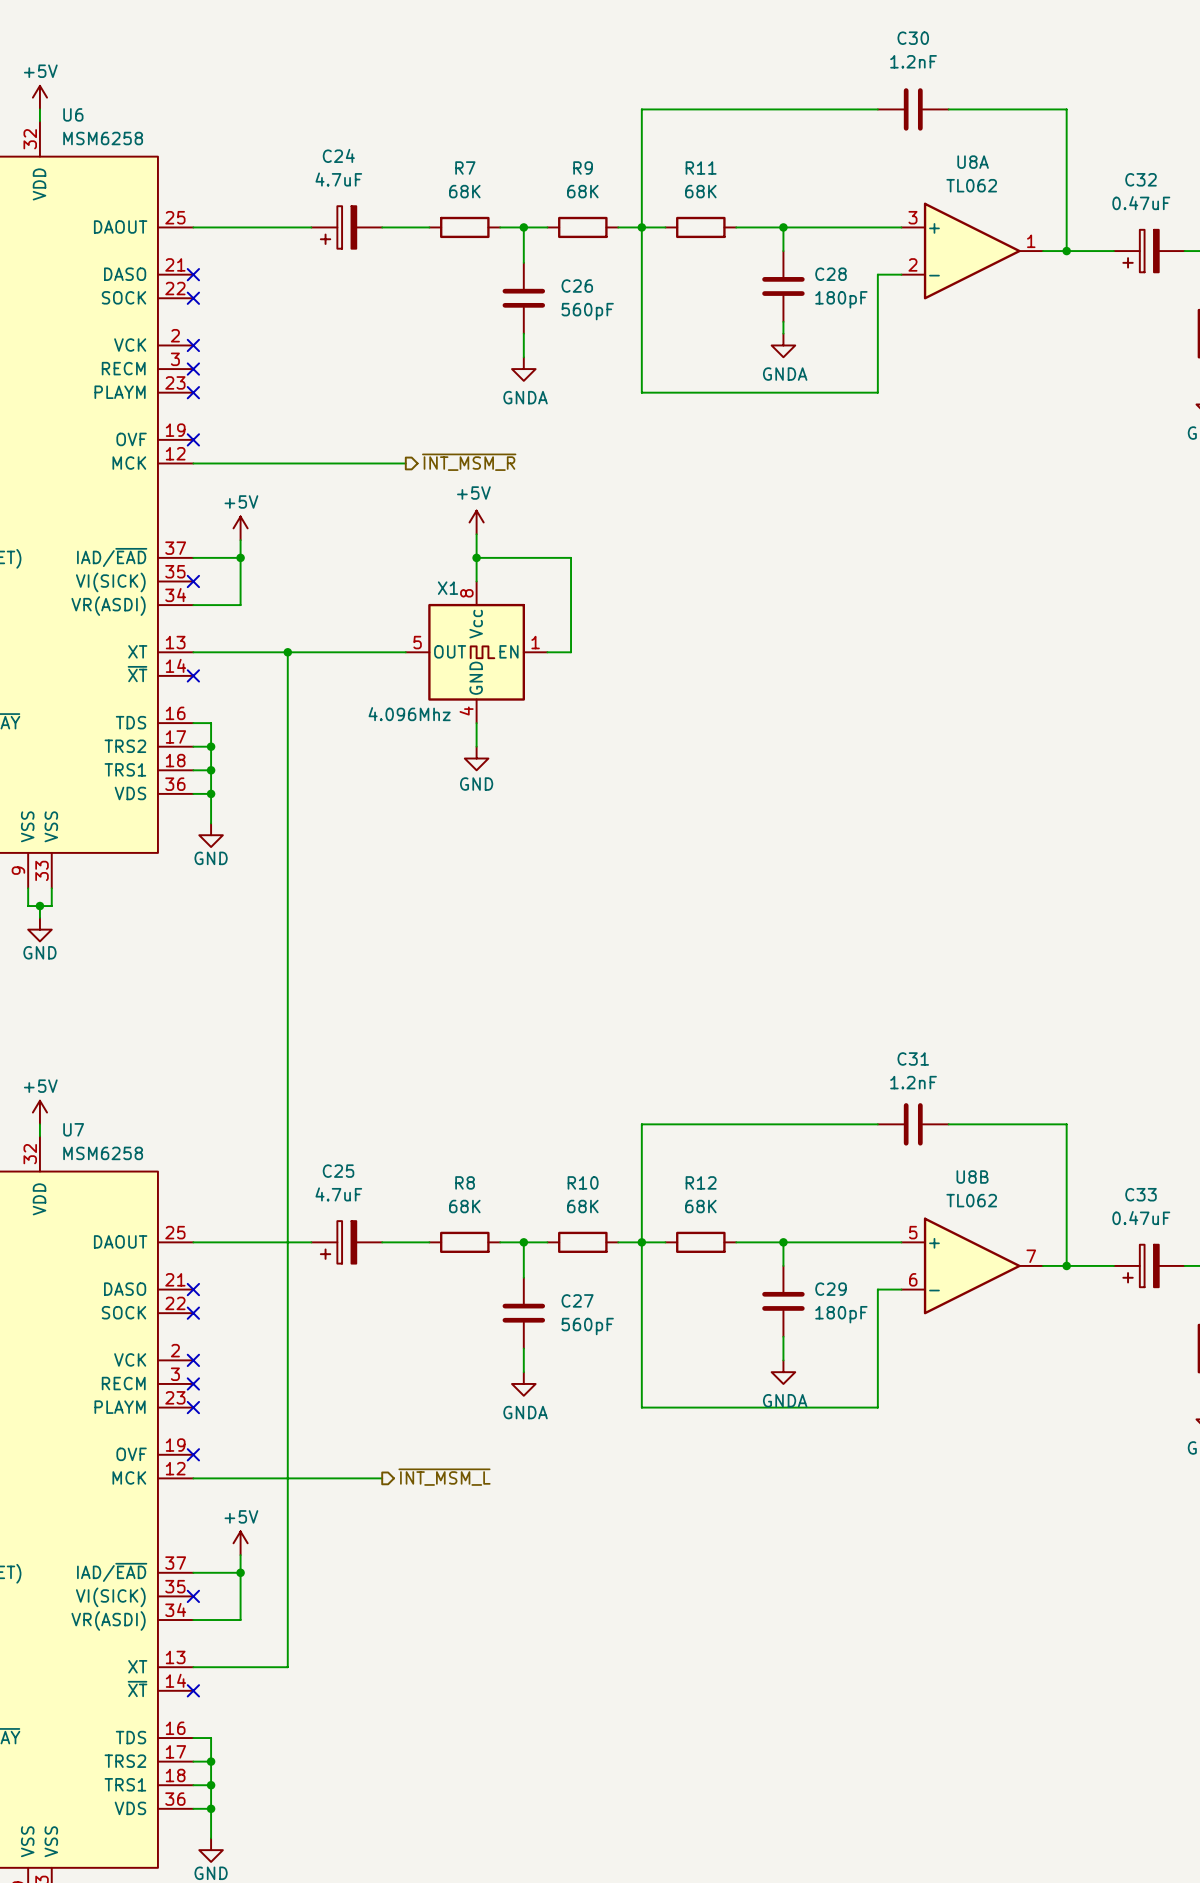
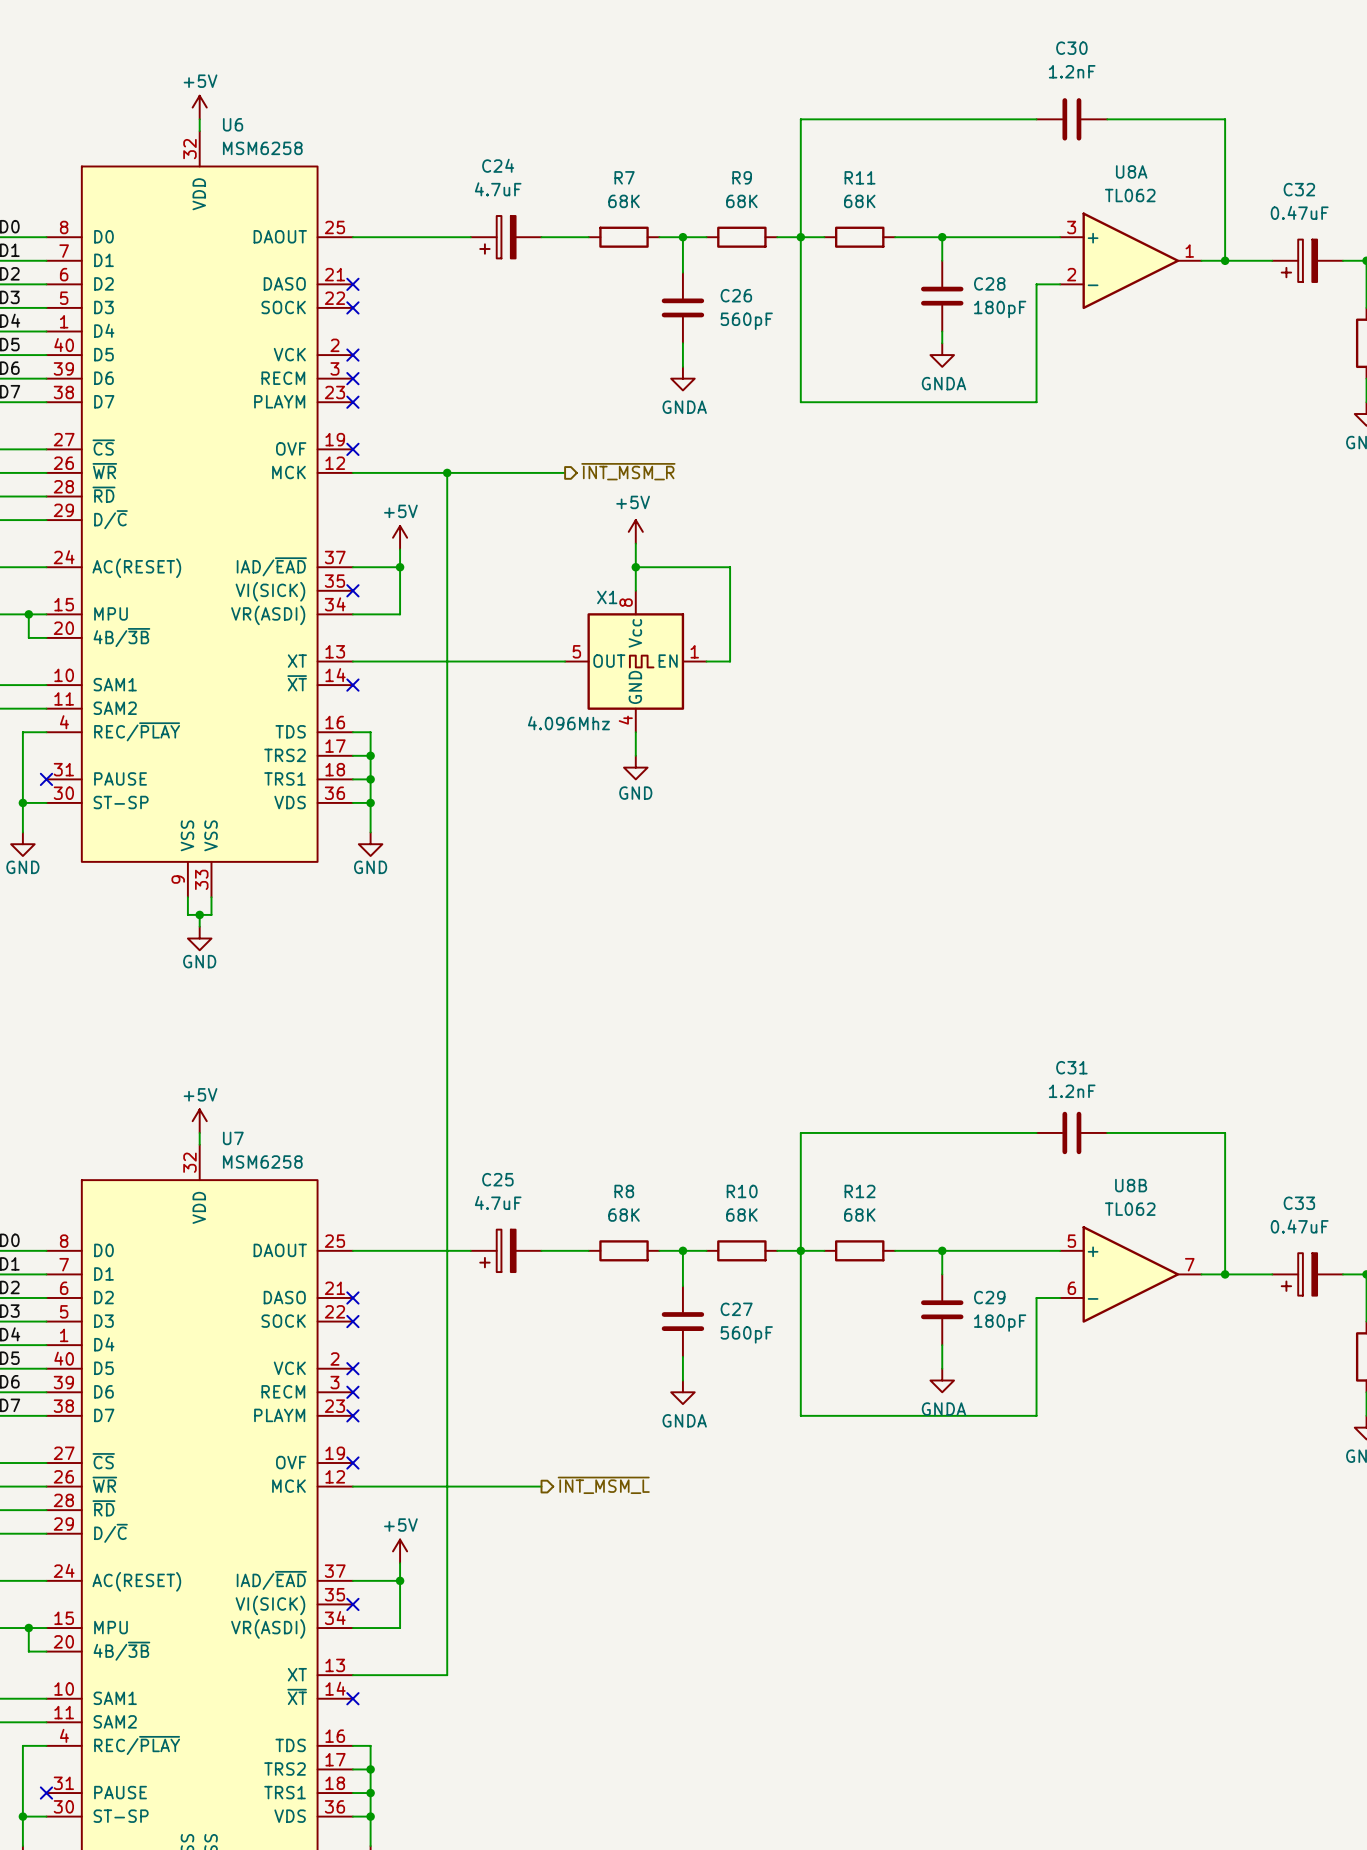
wire: none -> (447, 472) (447, 661)
junction: none -> (447, 472)
junction: (287, 652) -> none

